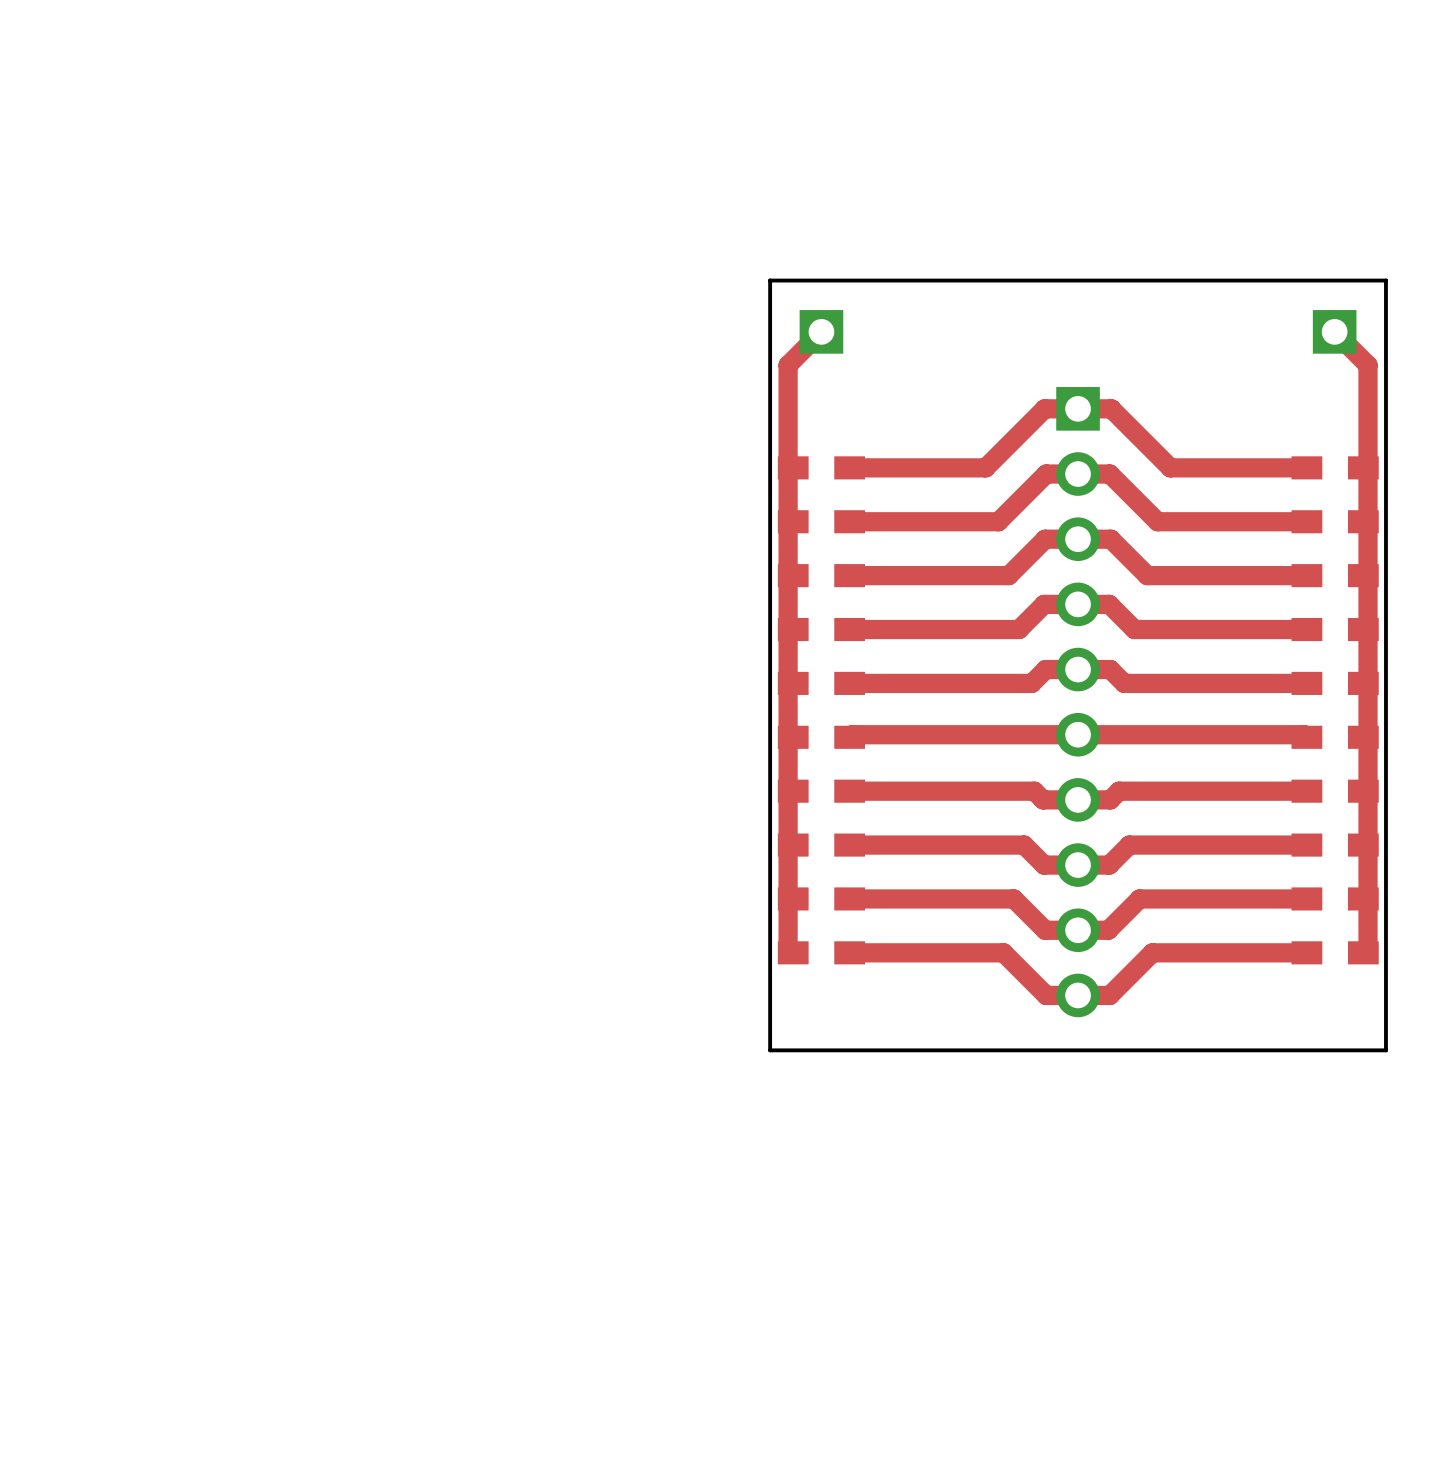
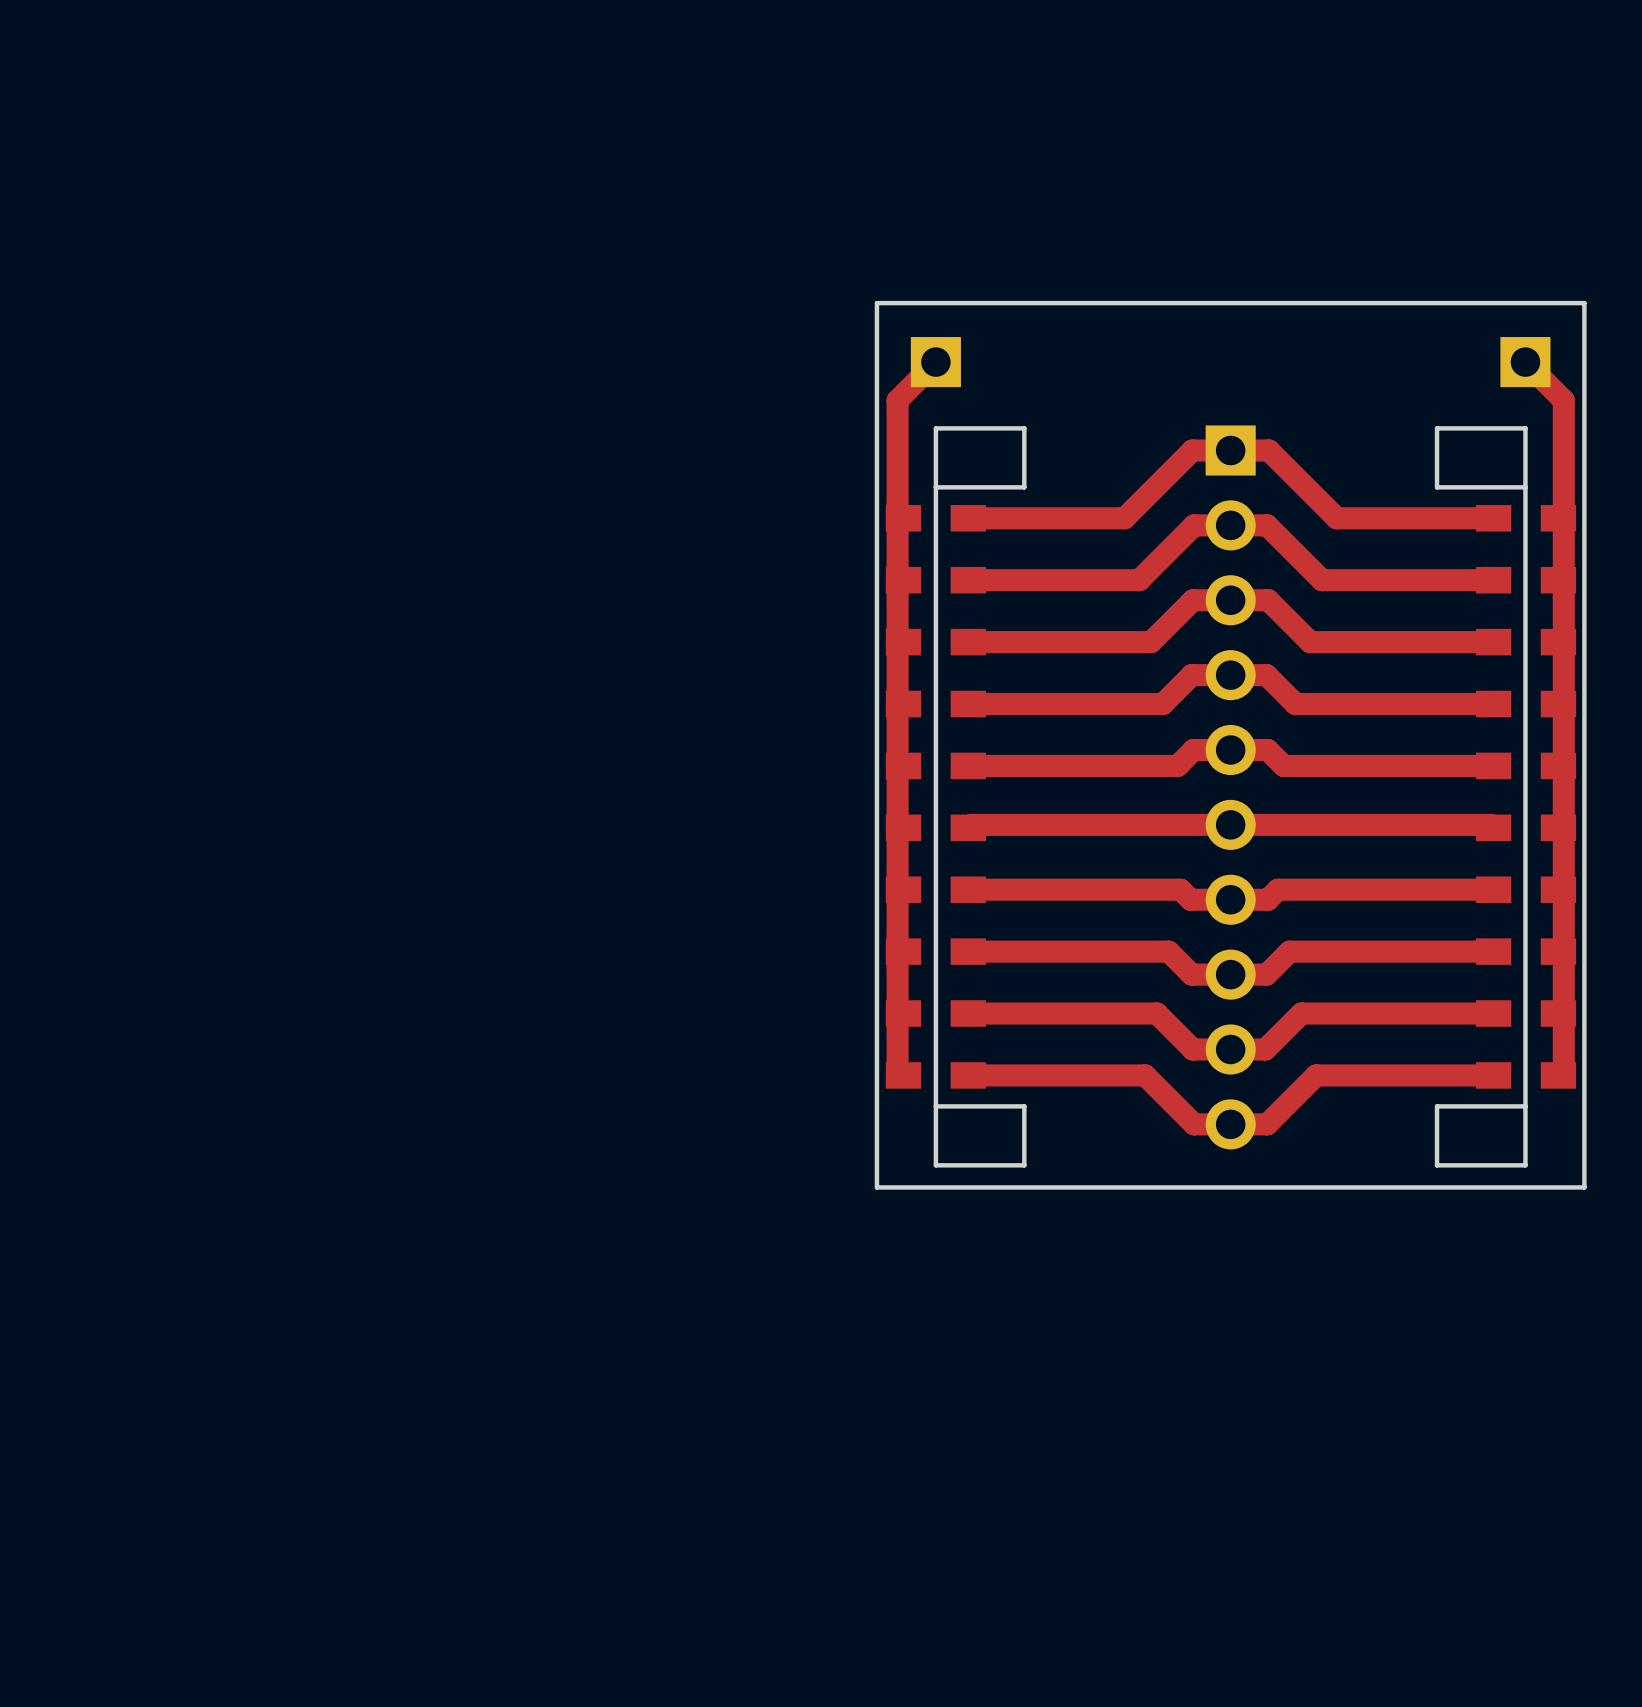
board edge: none -> (935, 487) (1024, 487) (1024, 428) (935, 428) (935, 1165) (1024, 1165) (1024, 1106) (935, 1106)
board edge: none -> (1525, 487) (1437, 487) (1437, 428) (1525, 428) (1525, 1165) (1437, 1165) (1437, 1106) (1525, 1106)

